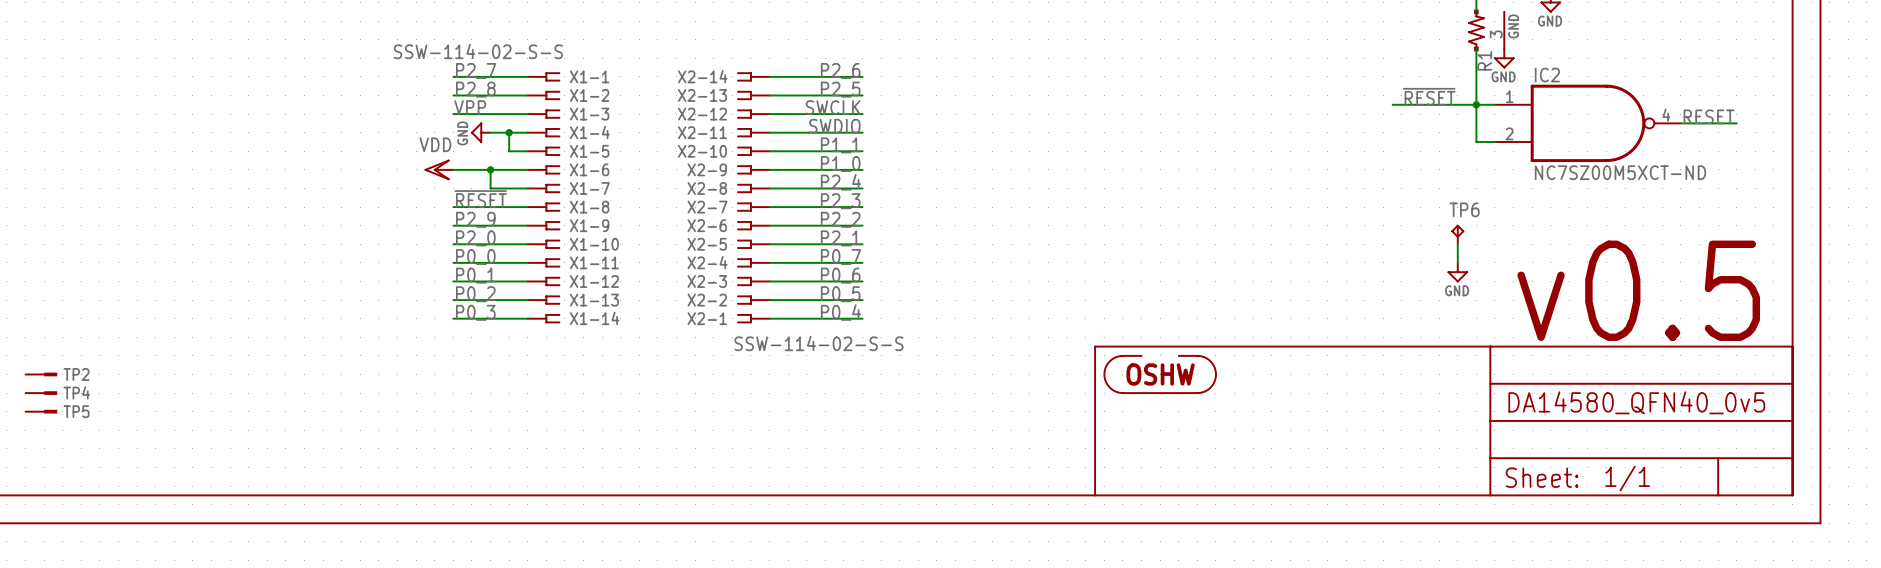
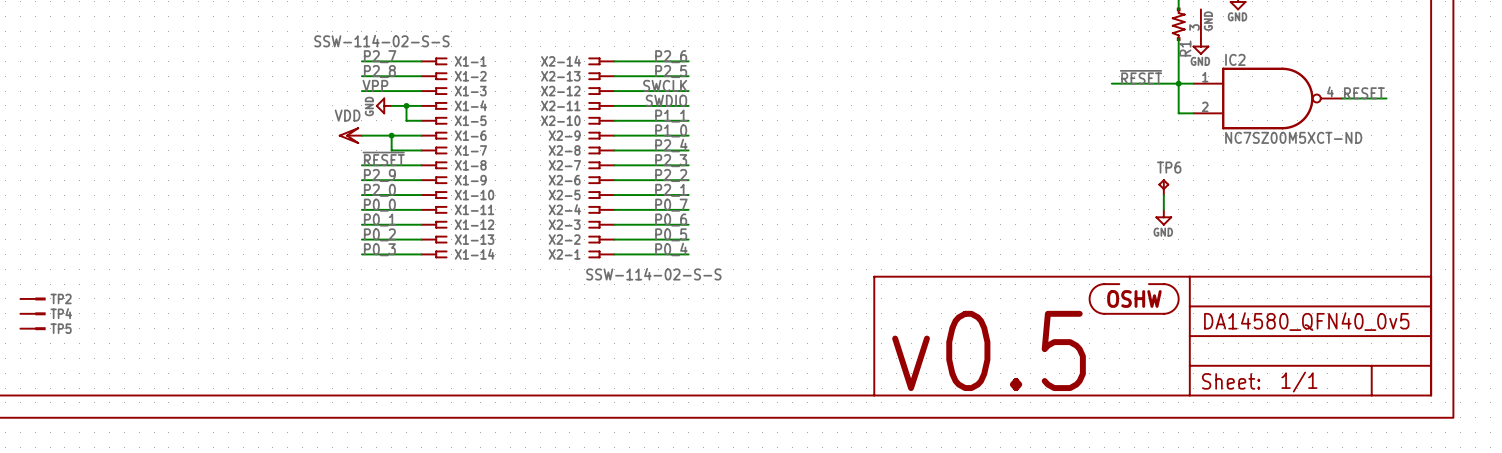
text: v0.5 (1638, 290) -> none
part: (1160, 374) -> none
part: none -> (1134, 298)
text: none -> v0.5 (989, 350)

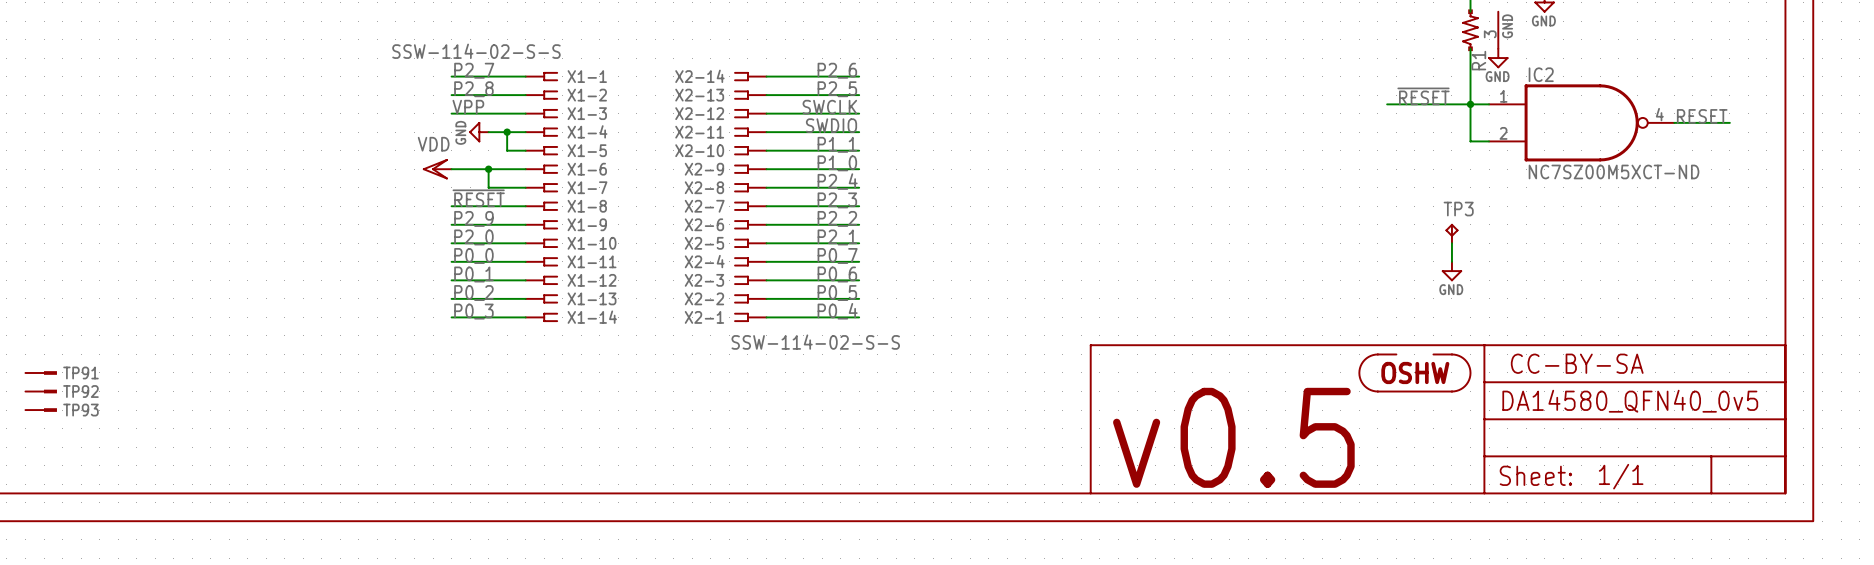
TP6 name: TP6 (1169, 167) -> TP3 (1458, 209)
text: none -> CC-BY-SA (1577, 363)
TP2 name: TP2 (61, 298) -> TP91 (80, 372)
TP4 name: TP4 (61, 313) -> TP92 (80, 391)
TP5 name: TP5 (61, 328) -> TP93 (80, 410)

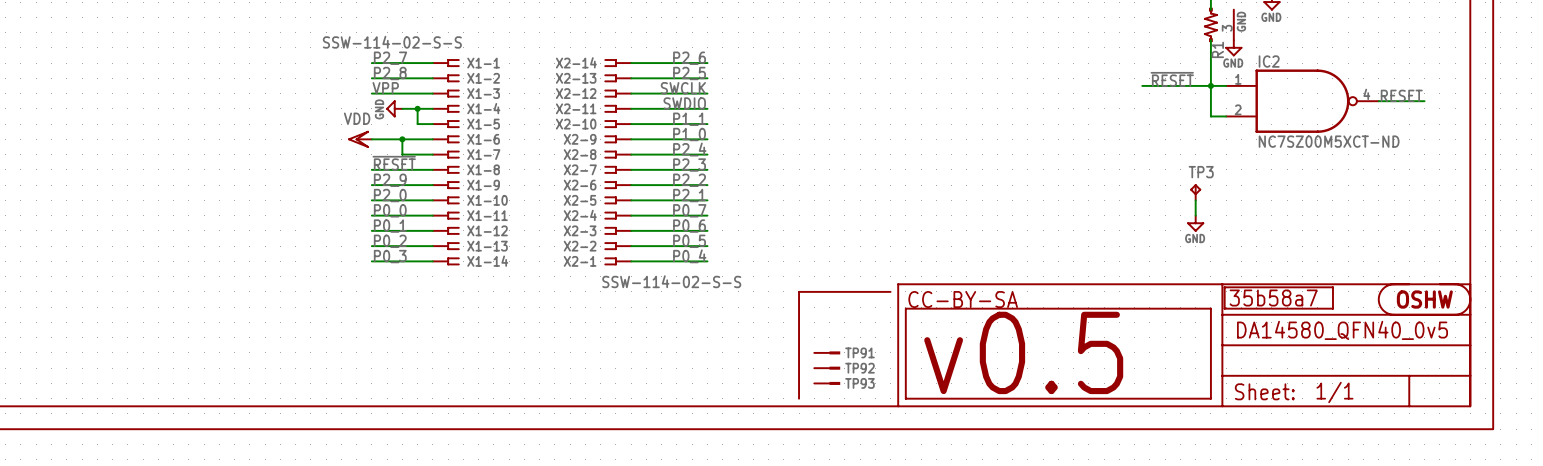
line: none -> (890, 291) (799, 291) (799, 398)
part: none -> 35b58a7 (1278, 298)
text: none -> CC-BY-SA (963, 299)
text: CC-BY-SA (1577, 363) -> none
part: none -> (1424, 299)
TP91 position: (41, 372) -> (827, 352)
part: (1414, 372) -> none
TP92 position: (41, 391) -> (827, 368)
TP93 position: (41, 410) -> (827, 383)
part: none -> v0.5 (1058, 353)
text: v0.5 (1233, 437) -> none

